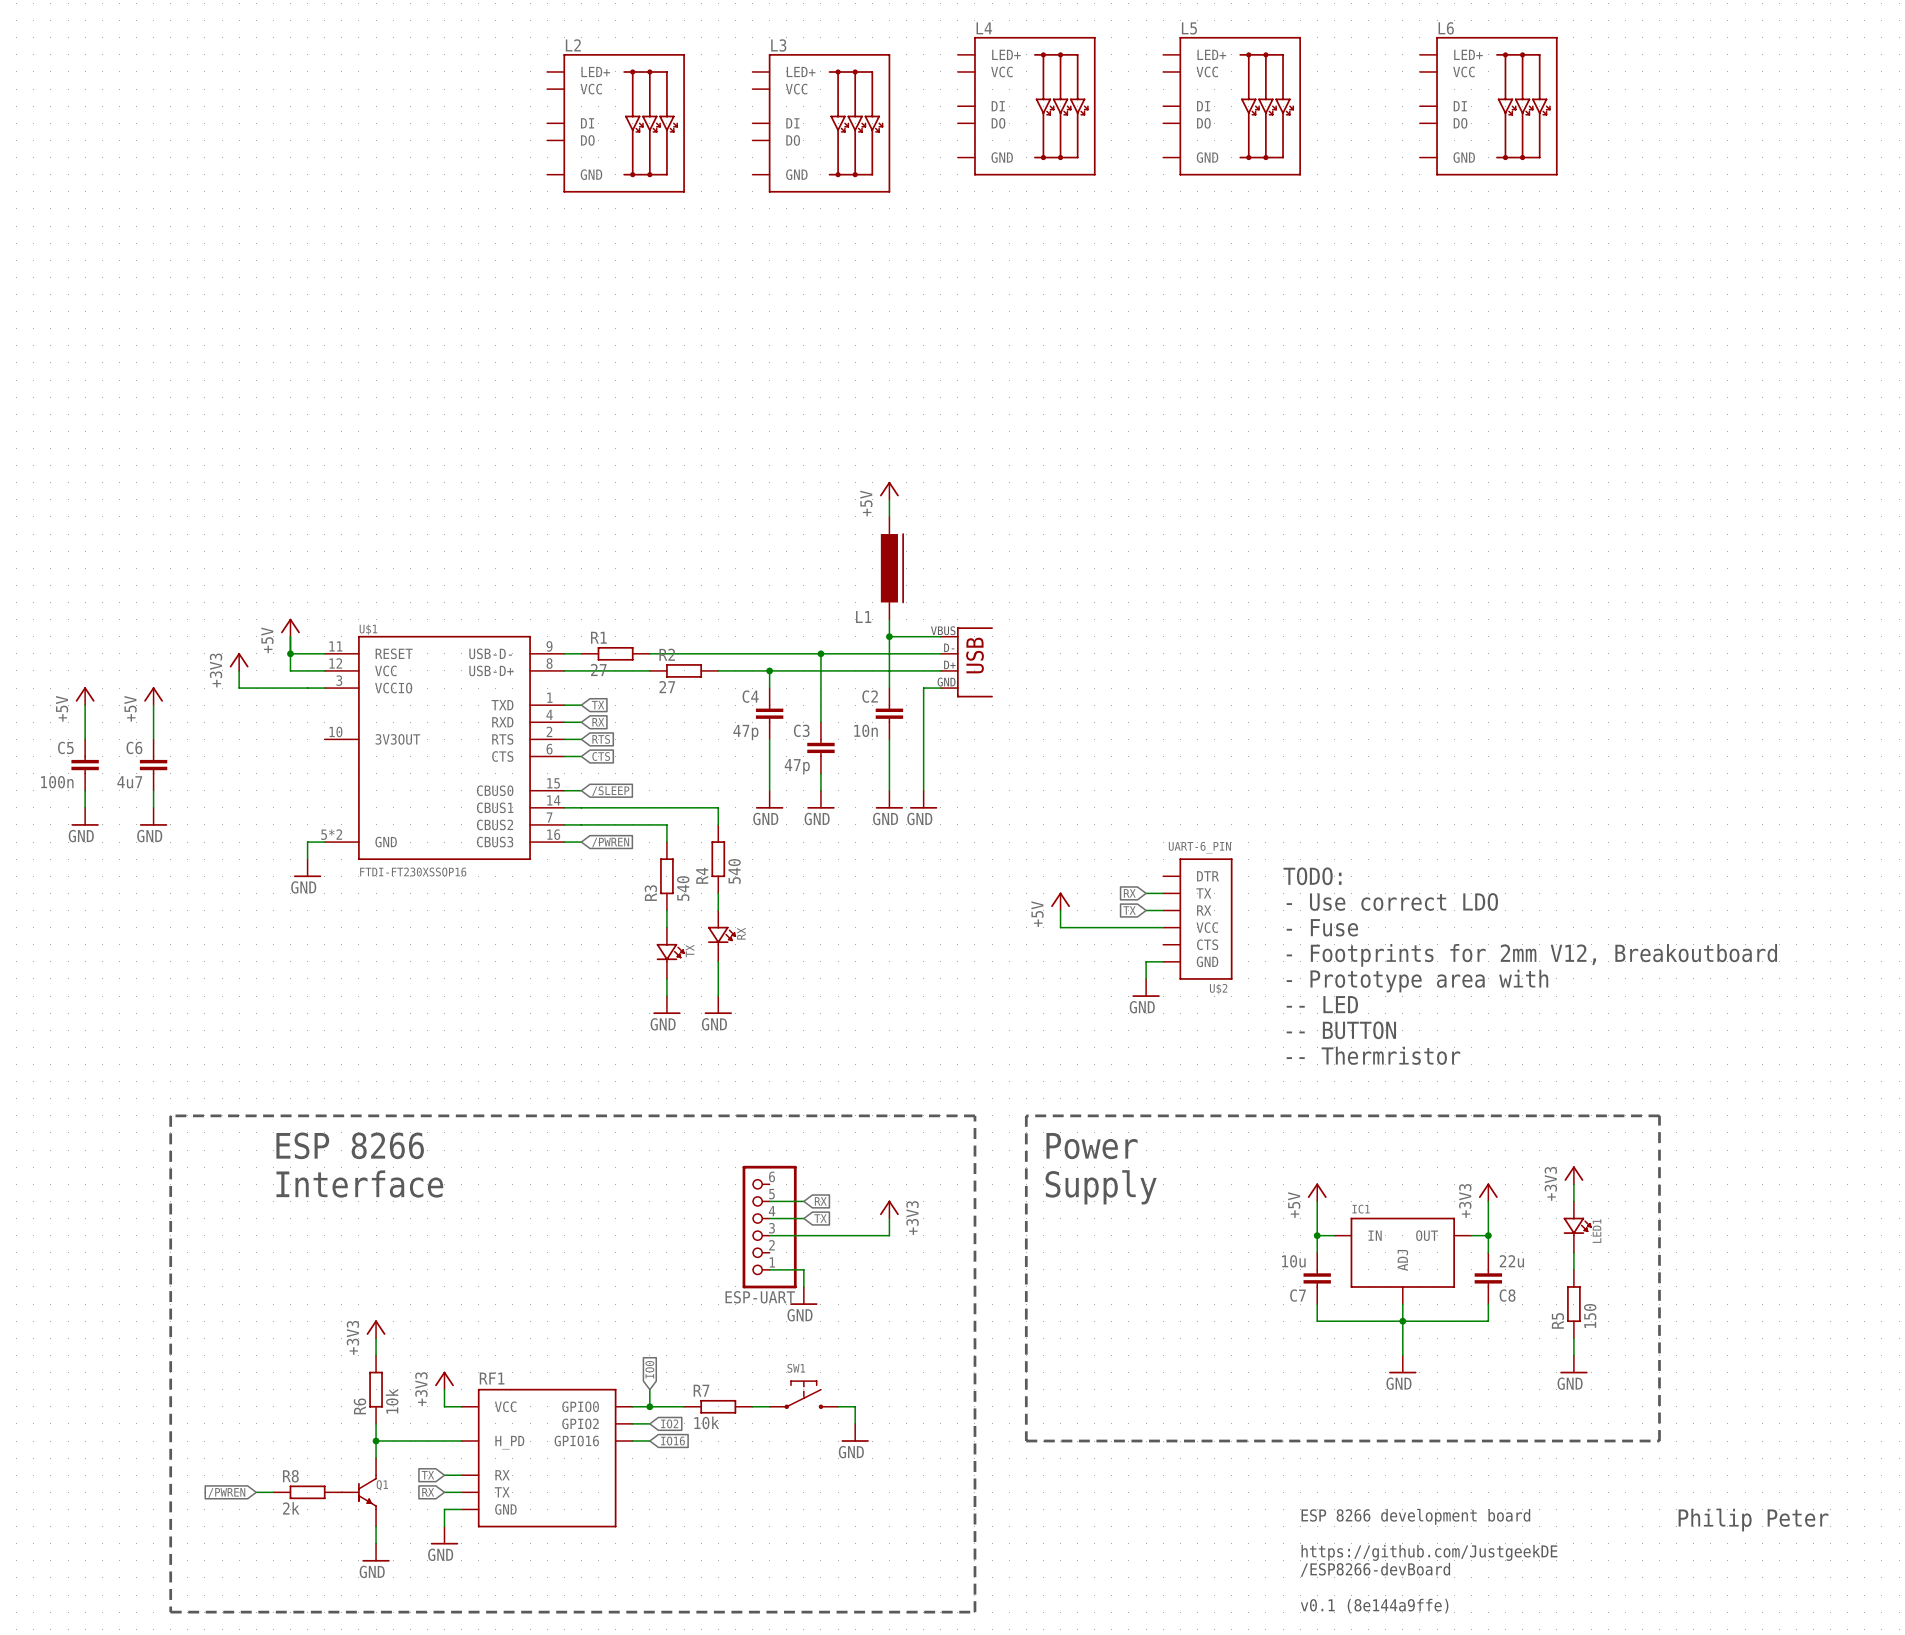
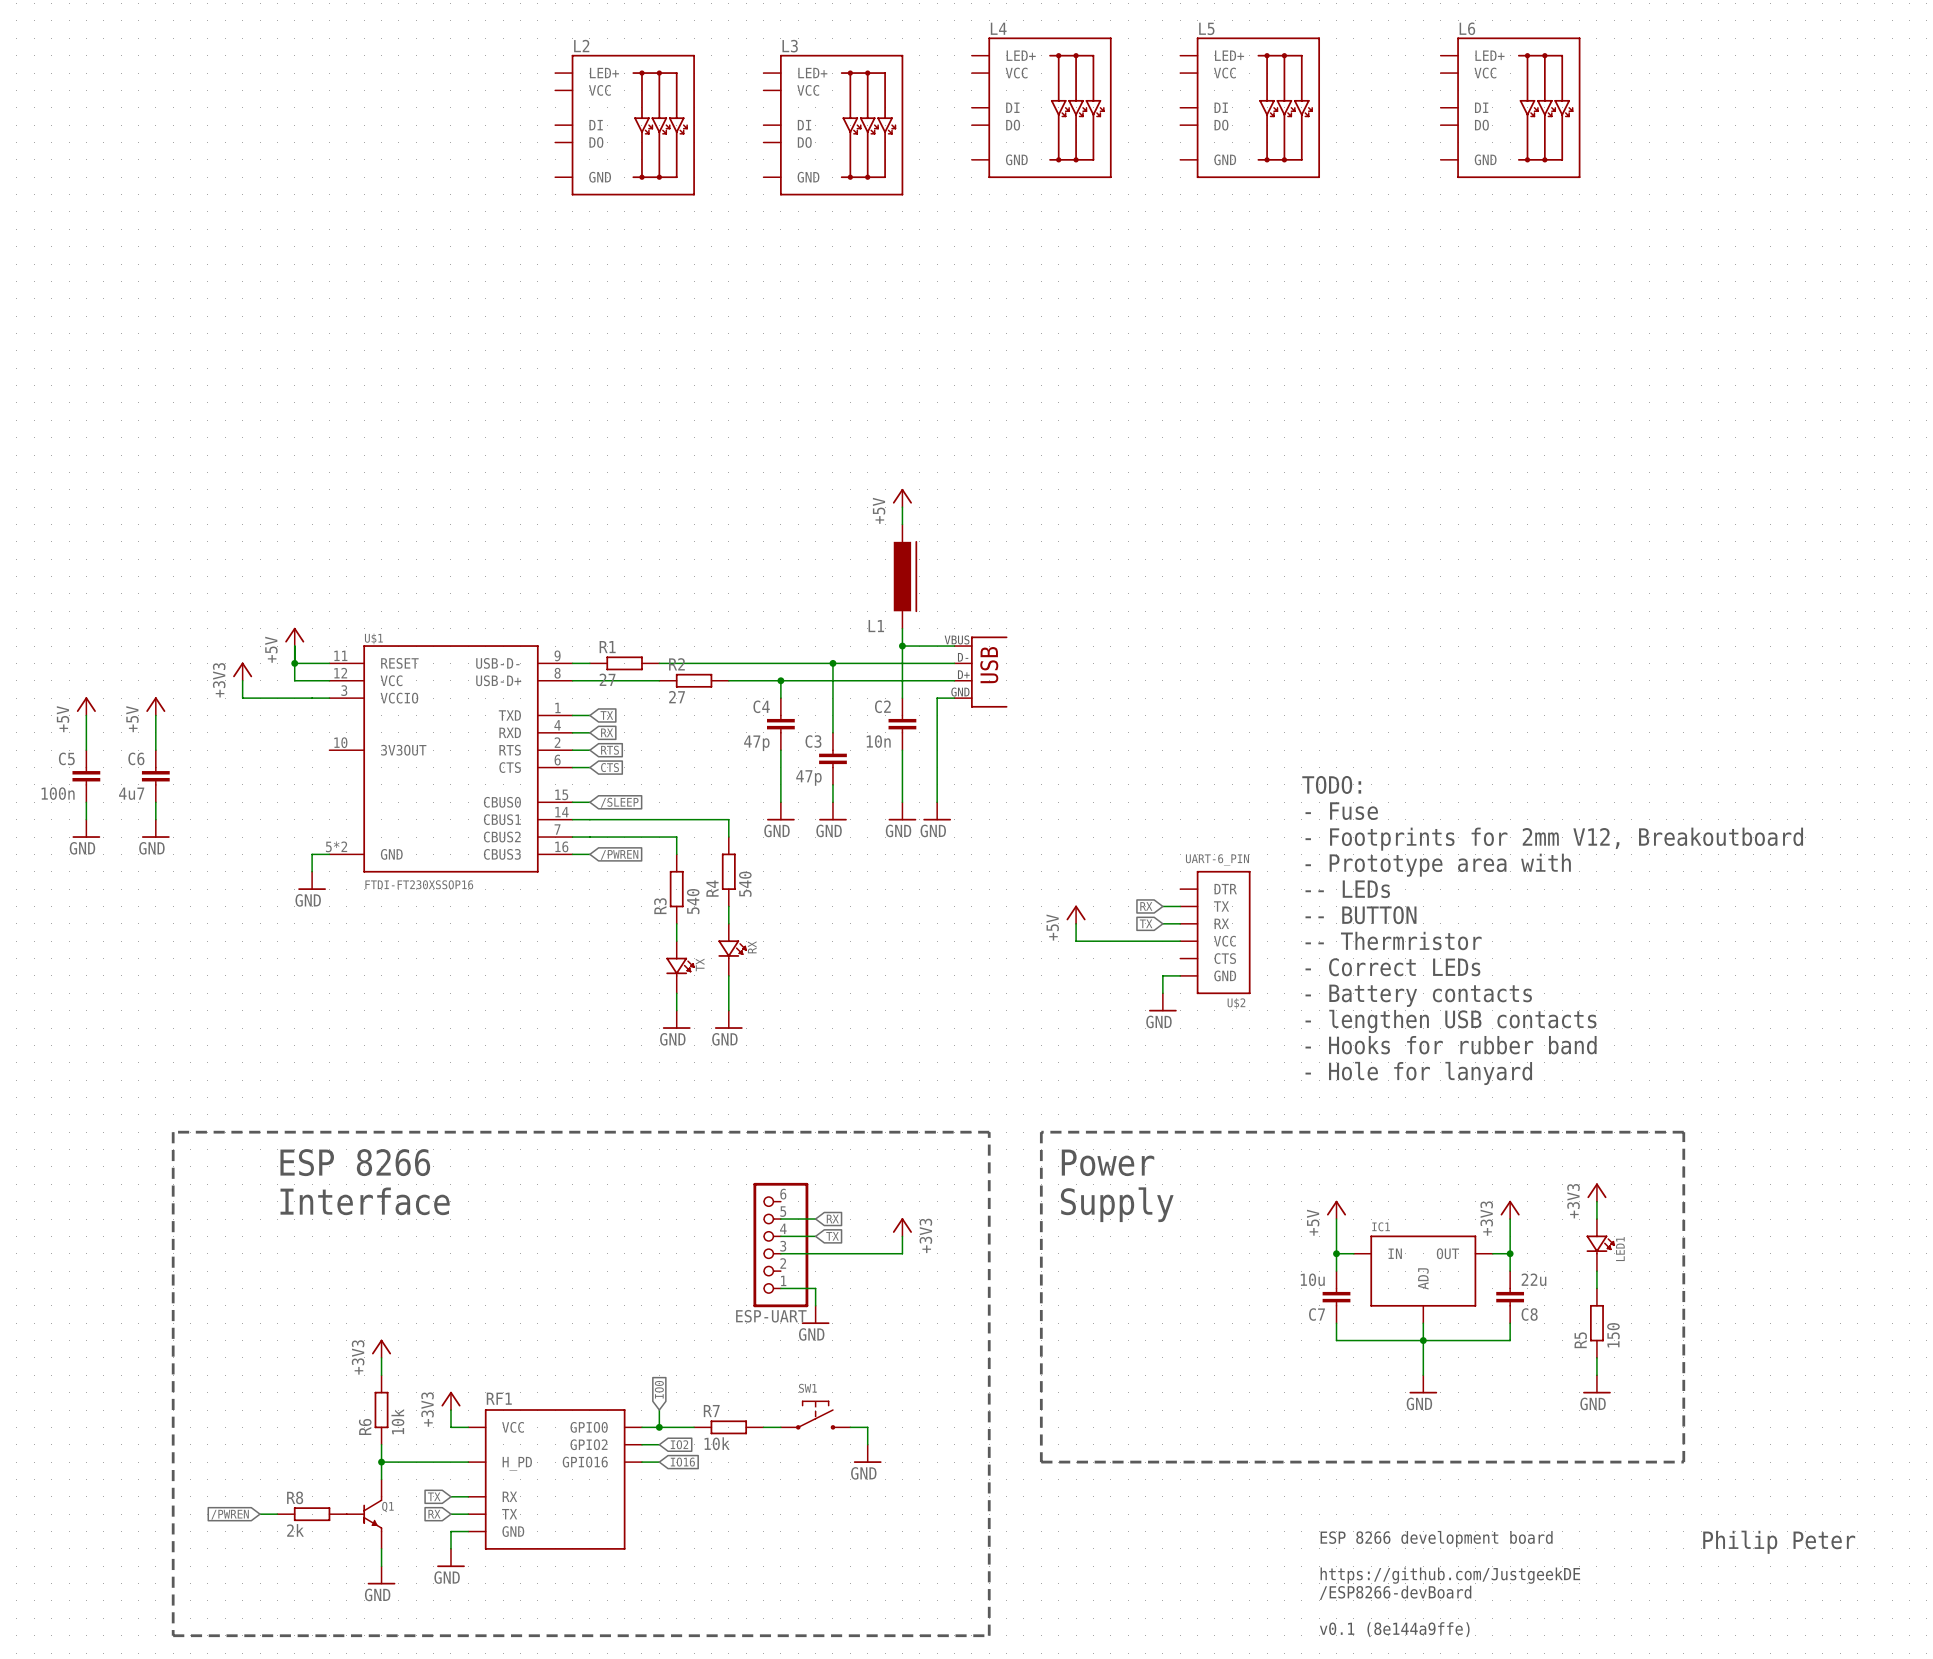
text: none -> TODO: (1331, 784)
text: none -> - Fuse (1341, 811)
text: none -> - Footprints for 2mm V12, Breakoutboard (1554, 839)
text: none -> - Prototype area with (1438, 865)
text: TODO: (1312, 876) -> -- LEDs (1347, 889)
text: - Use correct LDO (1392, 901) -> -- BUTTON (1360, 915)
text: - Fuse (1322, 927) -> -- Thermristor (1393, 941)
text: - Footprints for 2mm V12, Breakoutboard (1531, 955) -> - Correct LEDs (1392, 967)
text: - Prototype area with (1417, 981) -> - Battery contacts (1418, 995)
text: -- LED (1322, 1004) -> - lengthen USB contacts (1450, 1021)
text: -- BUTTON (1341, 1030) -> - Hooks for rubber band (1451, 1045)
text: -- Thermristor (1373, 1055) -> - Hole for lanyard (1418, 1073)

